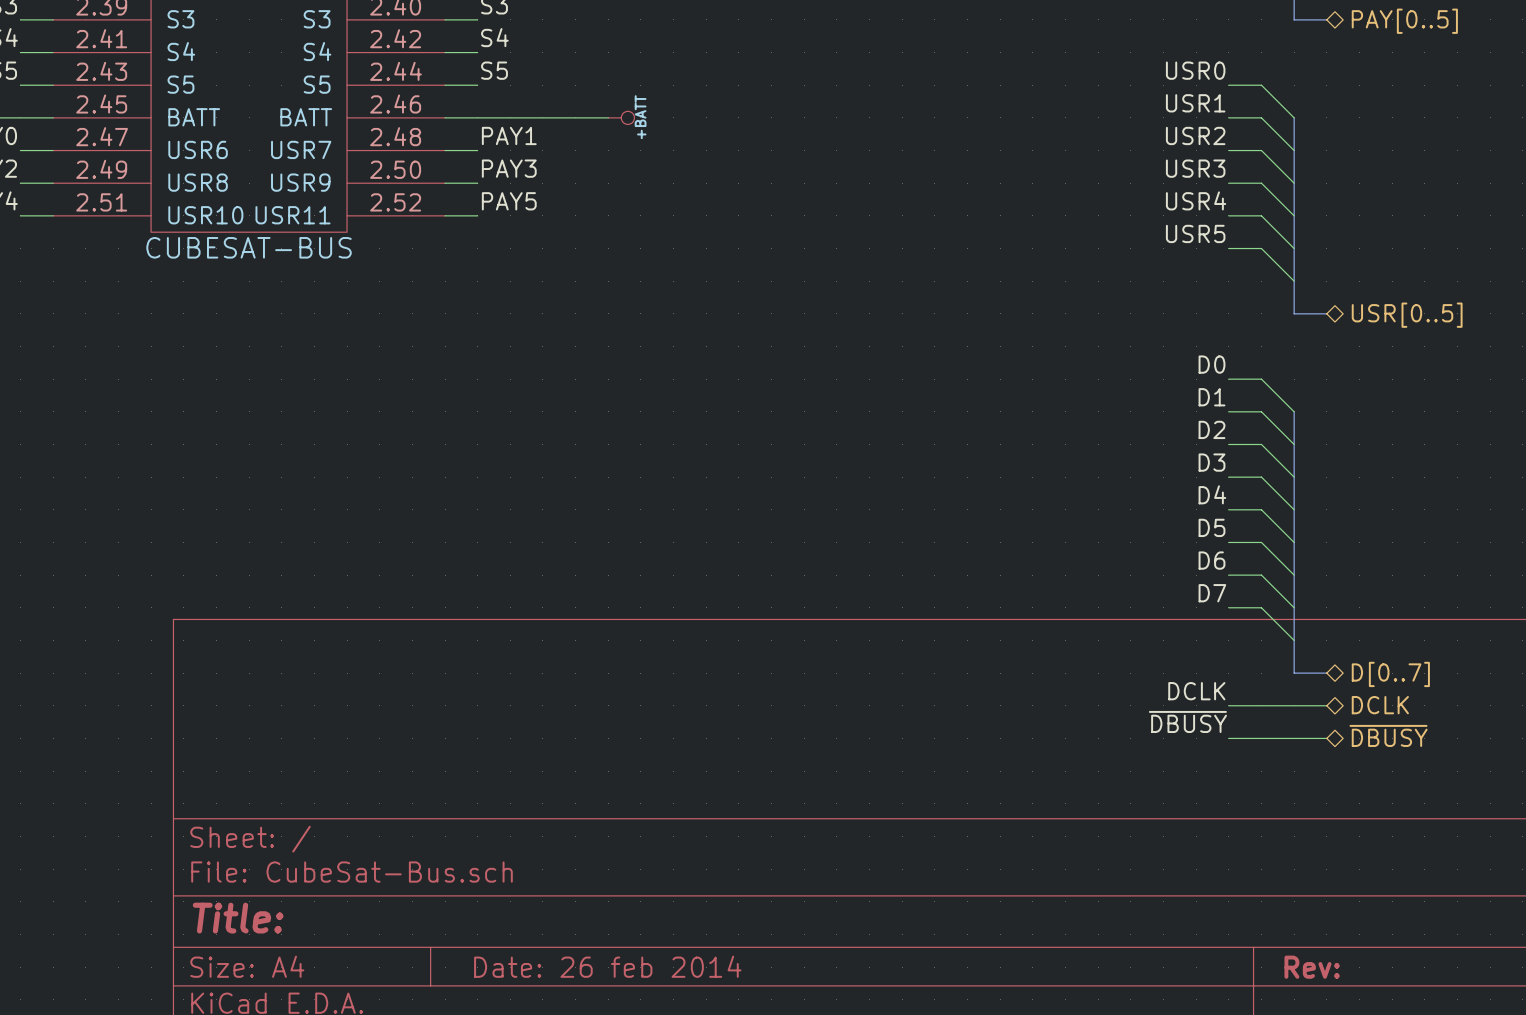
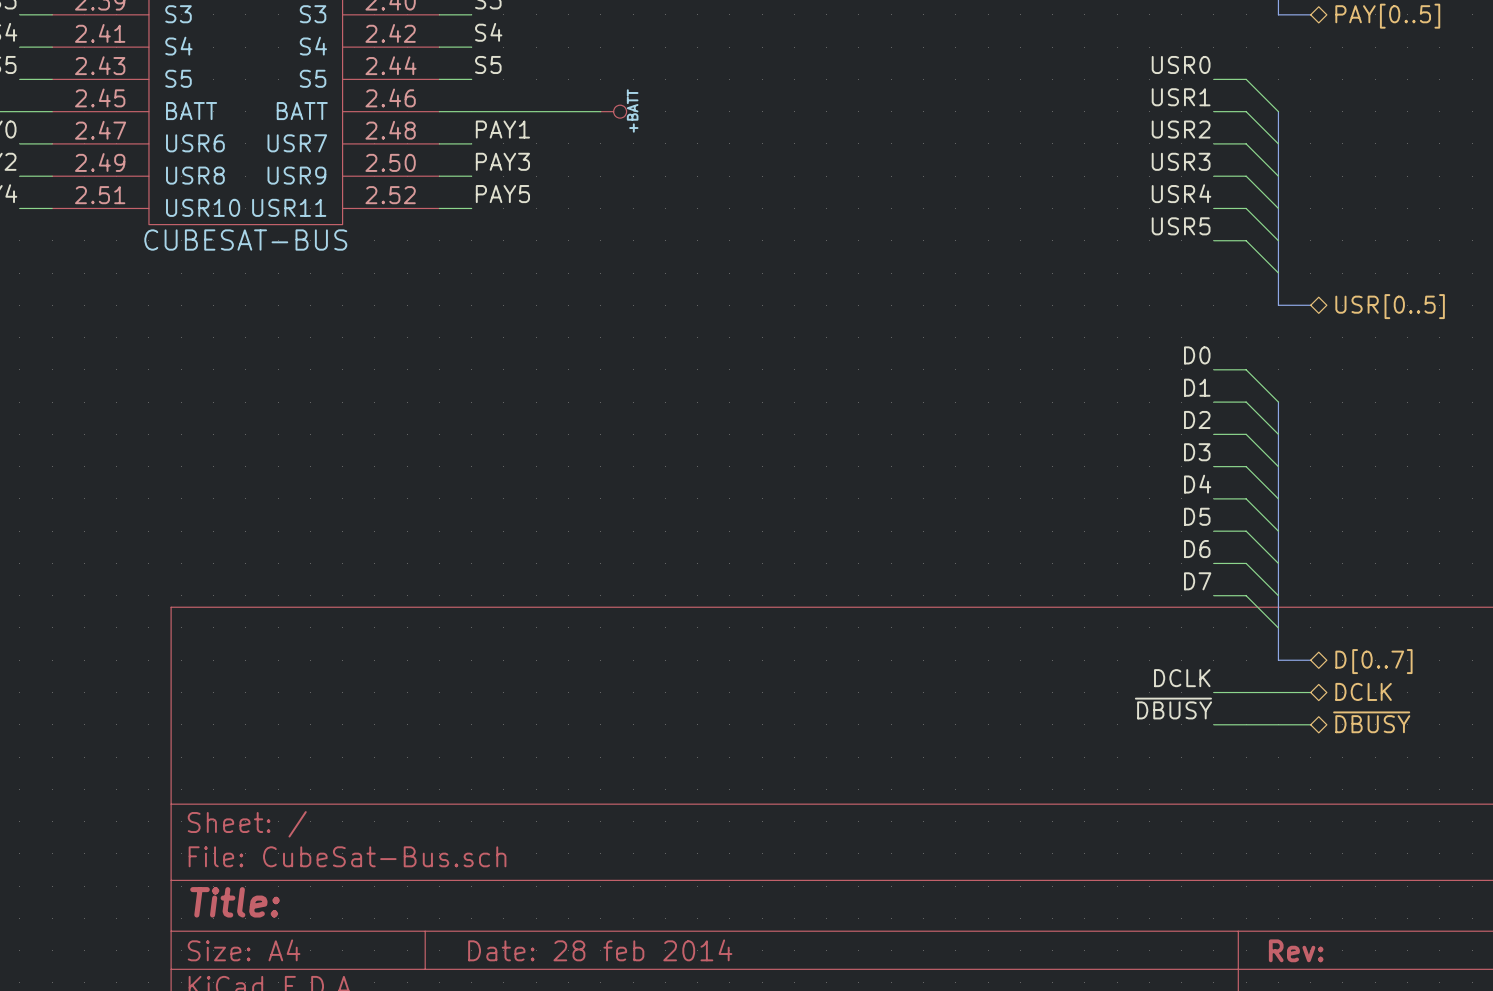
title block: Date: 26 feb 2014 (607, 966) -> Date: 28 feb 2014 (600, 950)

